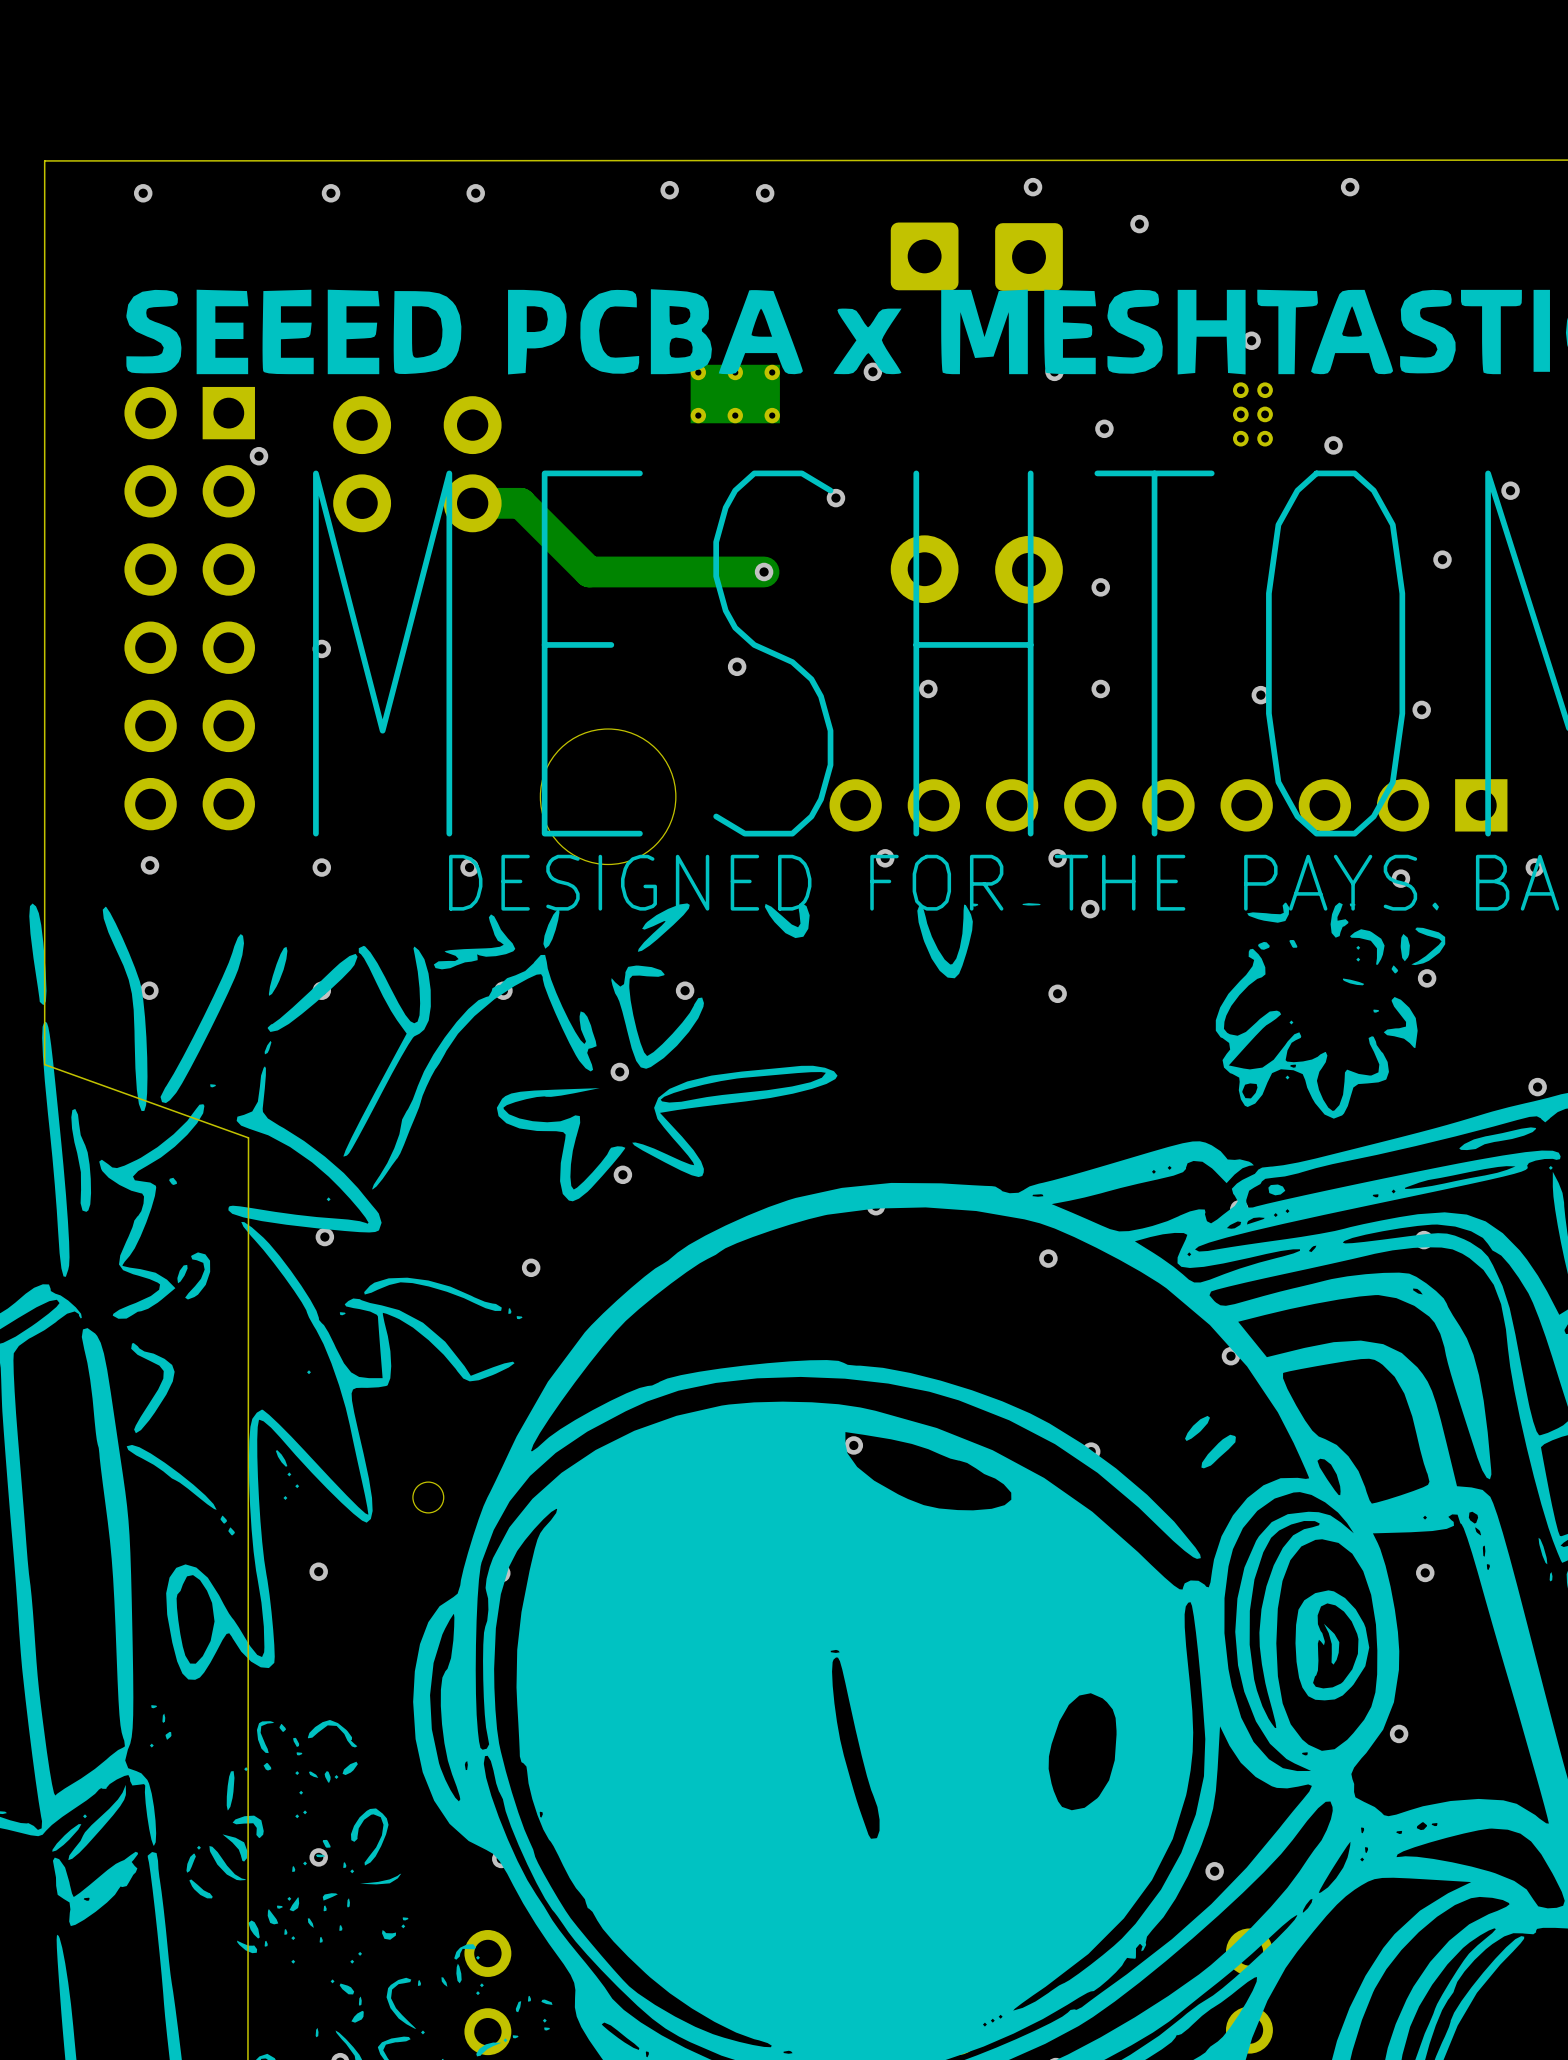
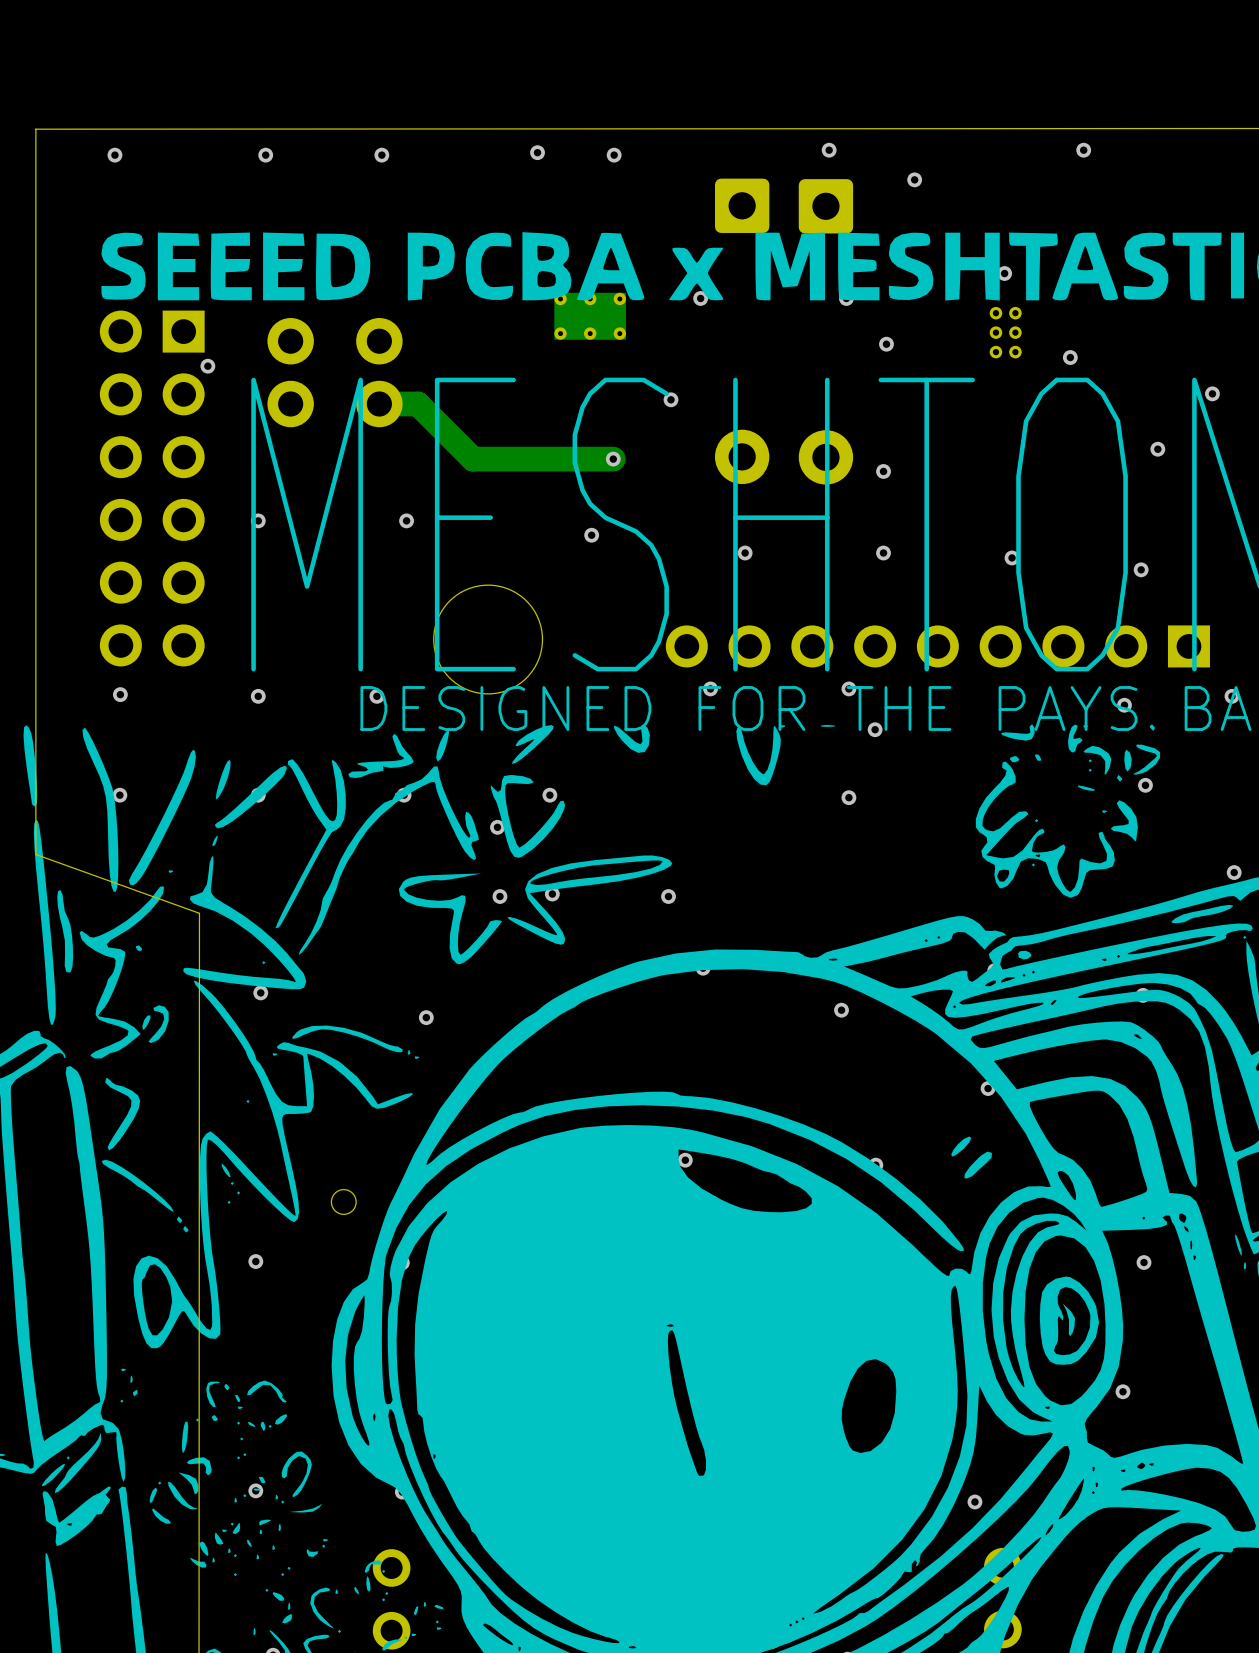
via: none -> (406, 520)
via: none -> (497, 827)
via: (619, 1071) -> none
via: none -> (552, 894)
via: none -> (499, 896)
via: none -> (668, 896)
via: (622, 1174) -> none

